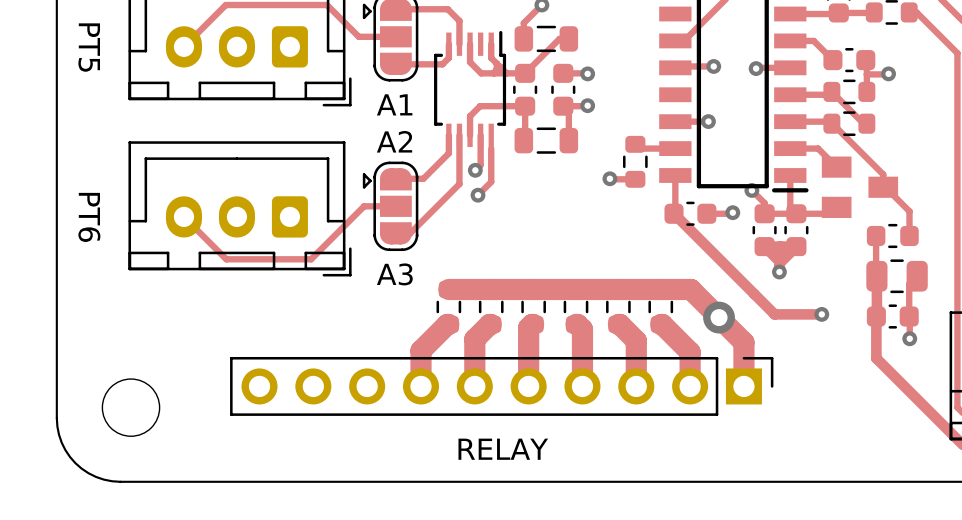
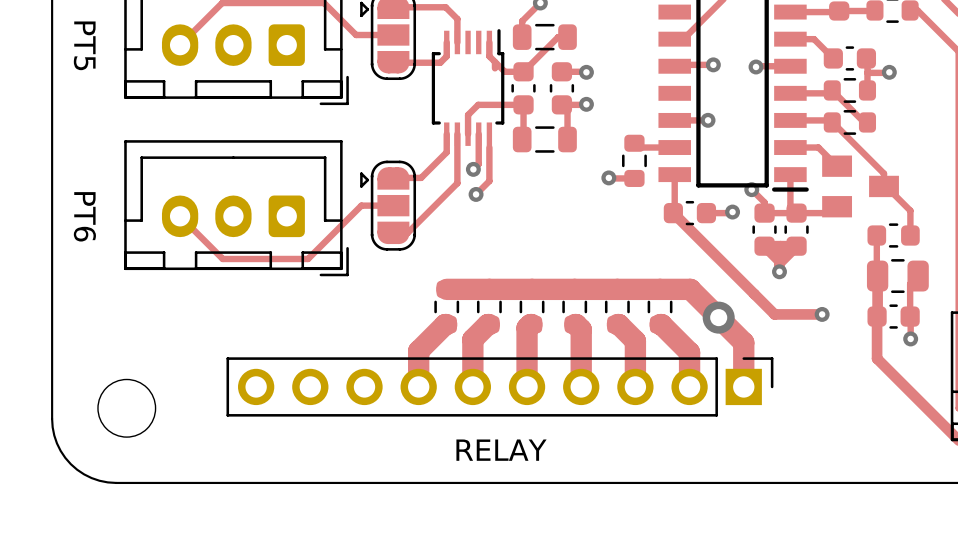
track: (470, 44) (470, 62) (481, 73) (506, 73) -> none
text: A1 (394, 104) -> none
text: A2 (394, 141) -> none
text: A3 (394, 274) -> none

